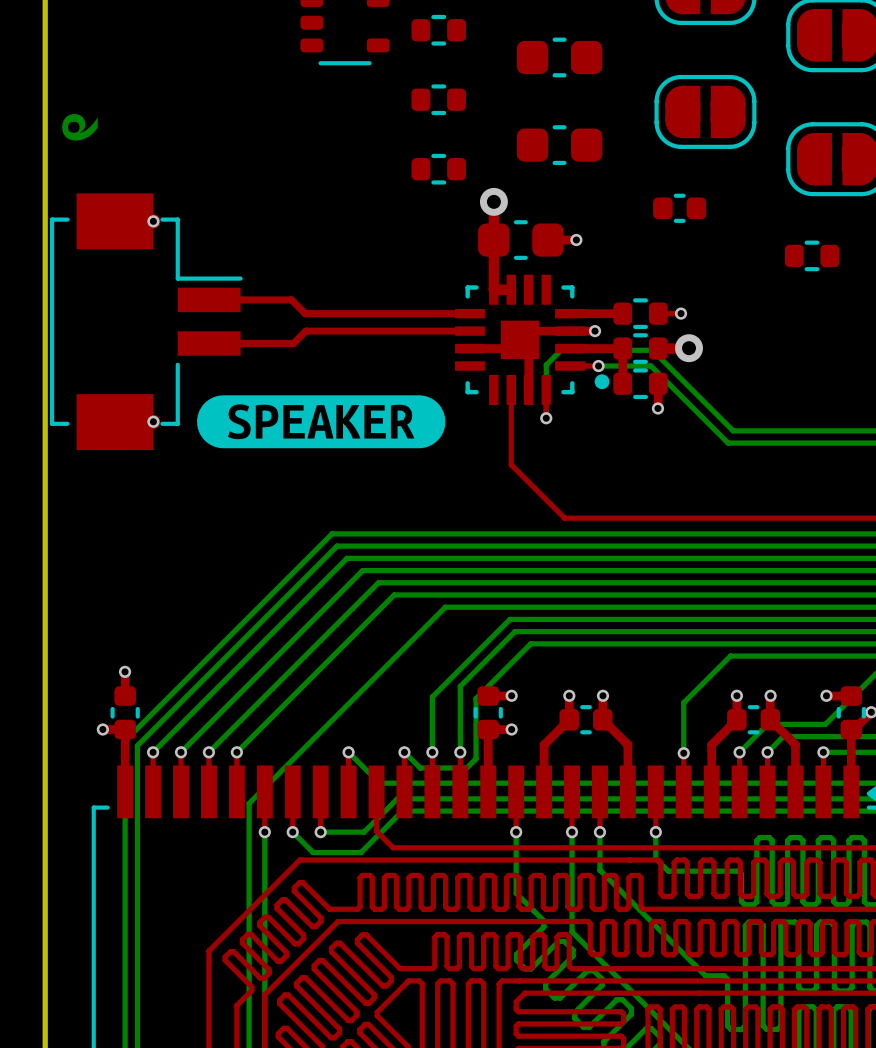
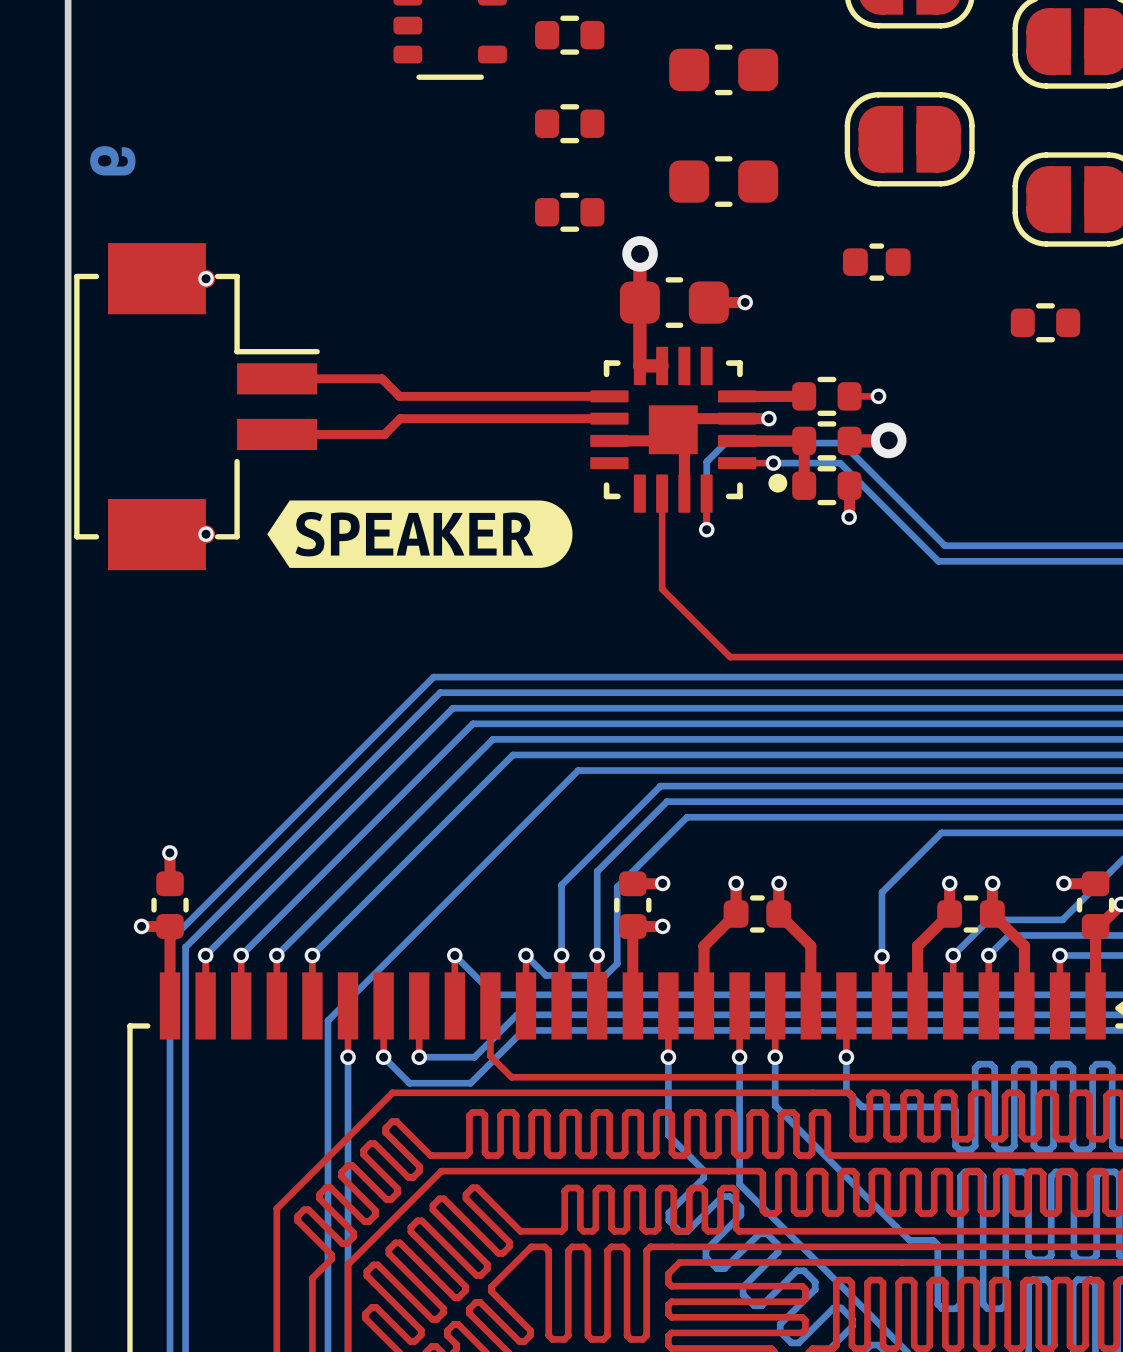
drawing shape: [197, 395, 446, 449] -> [267, 500, 573, 568]

